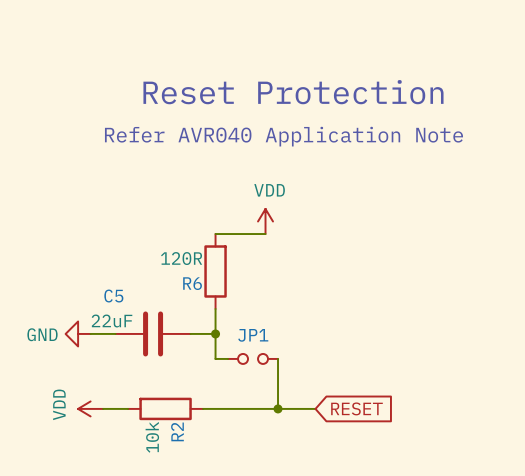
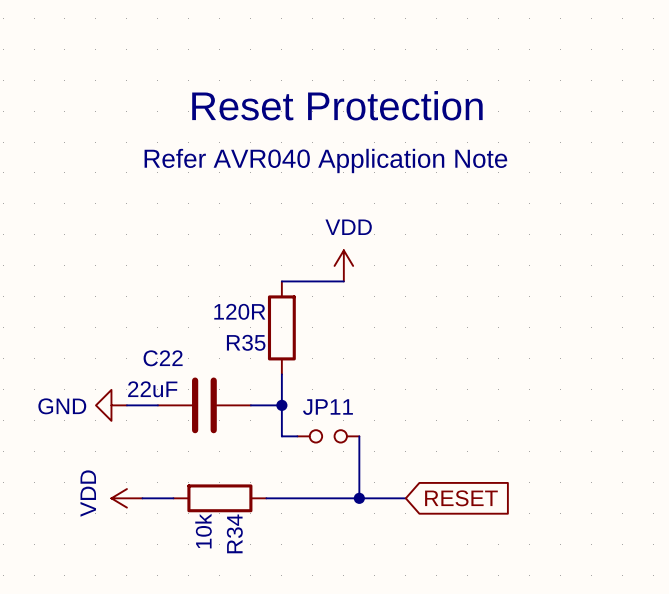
R6 name: R6 (192, 283) -> R35 (246, 342)
C5 name: C5 (113, 296) -> C22 (163, 358)
JP1 name: JP1 (253, 335) -> JP11 (327, 407)
R2 name: R2 (177, 431) -> R34 (234, 533)

